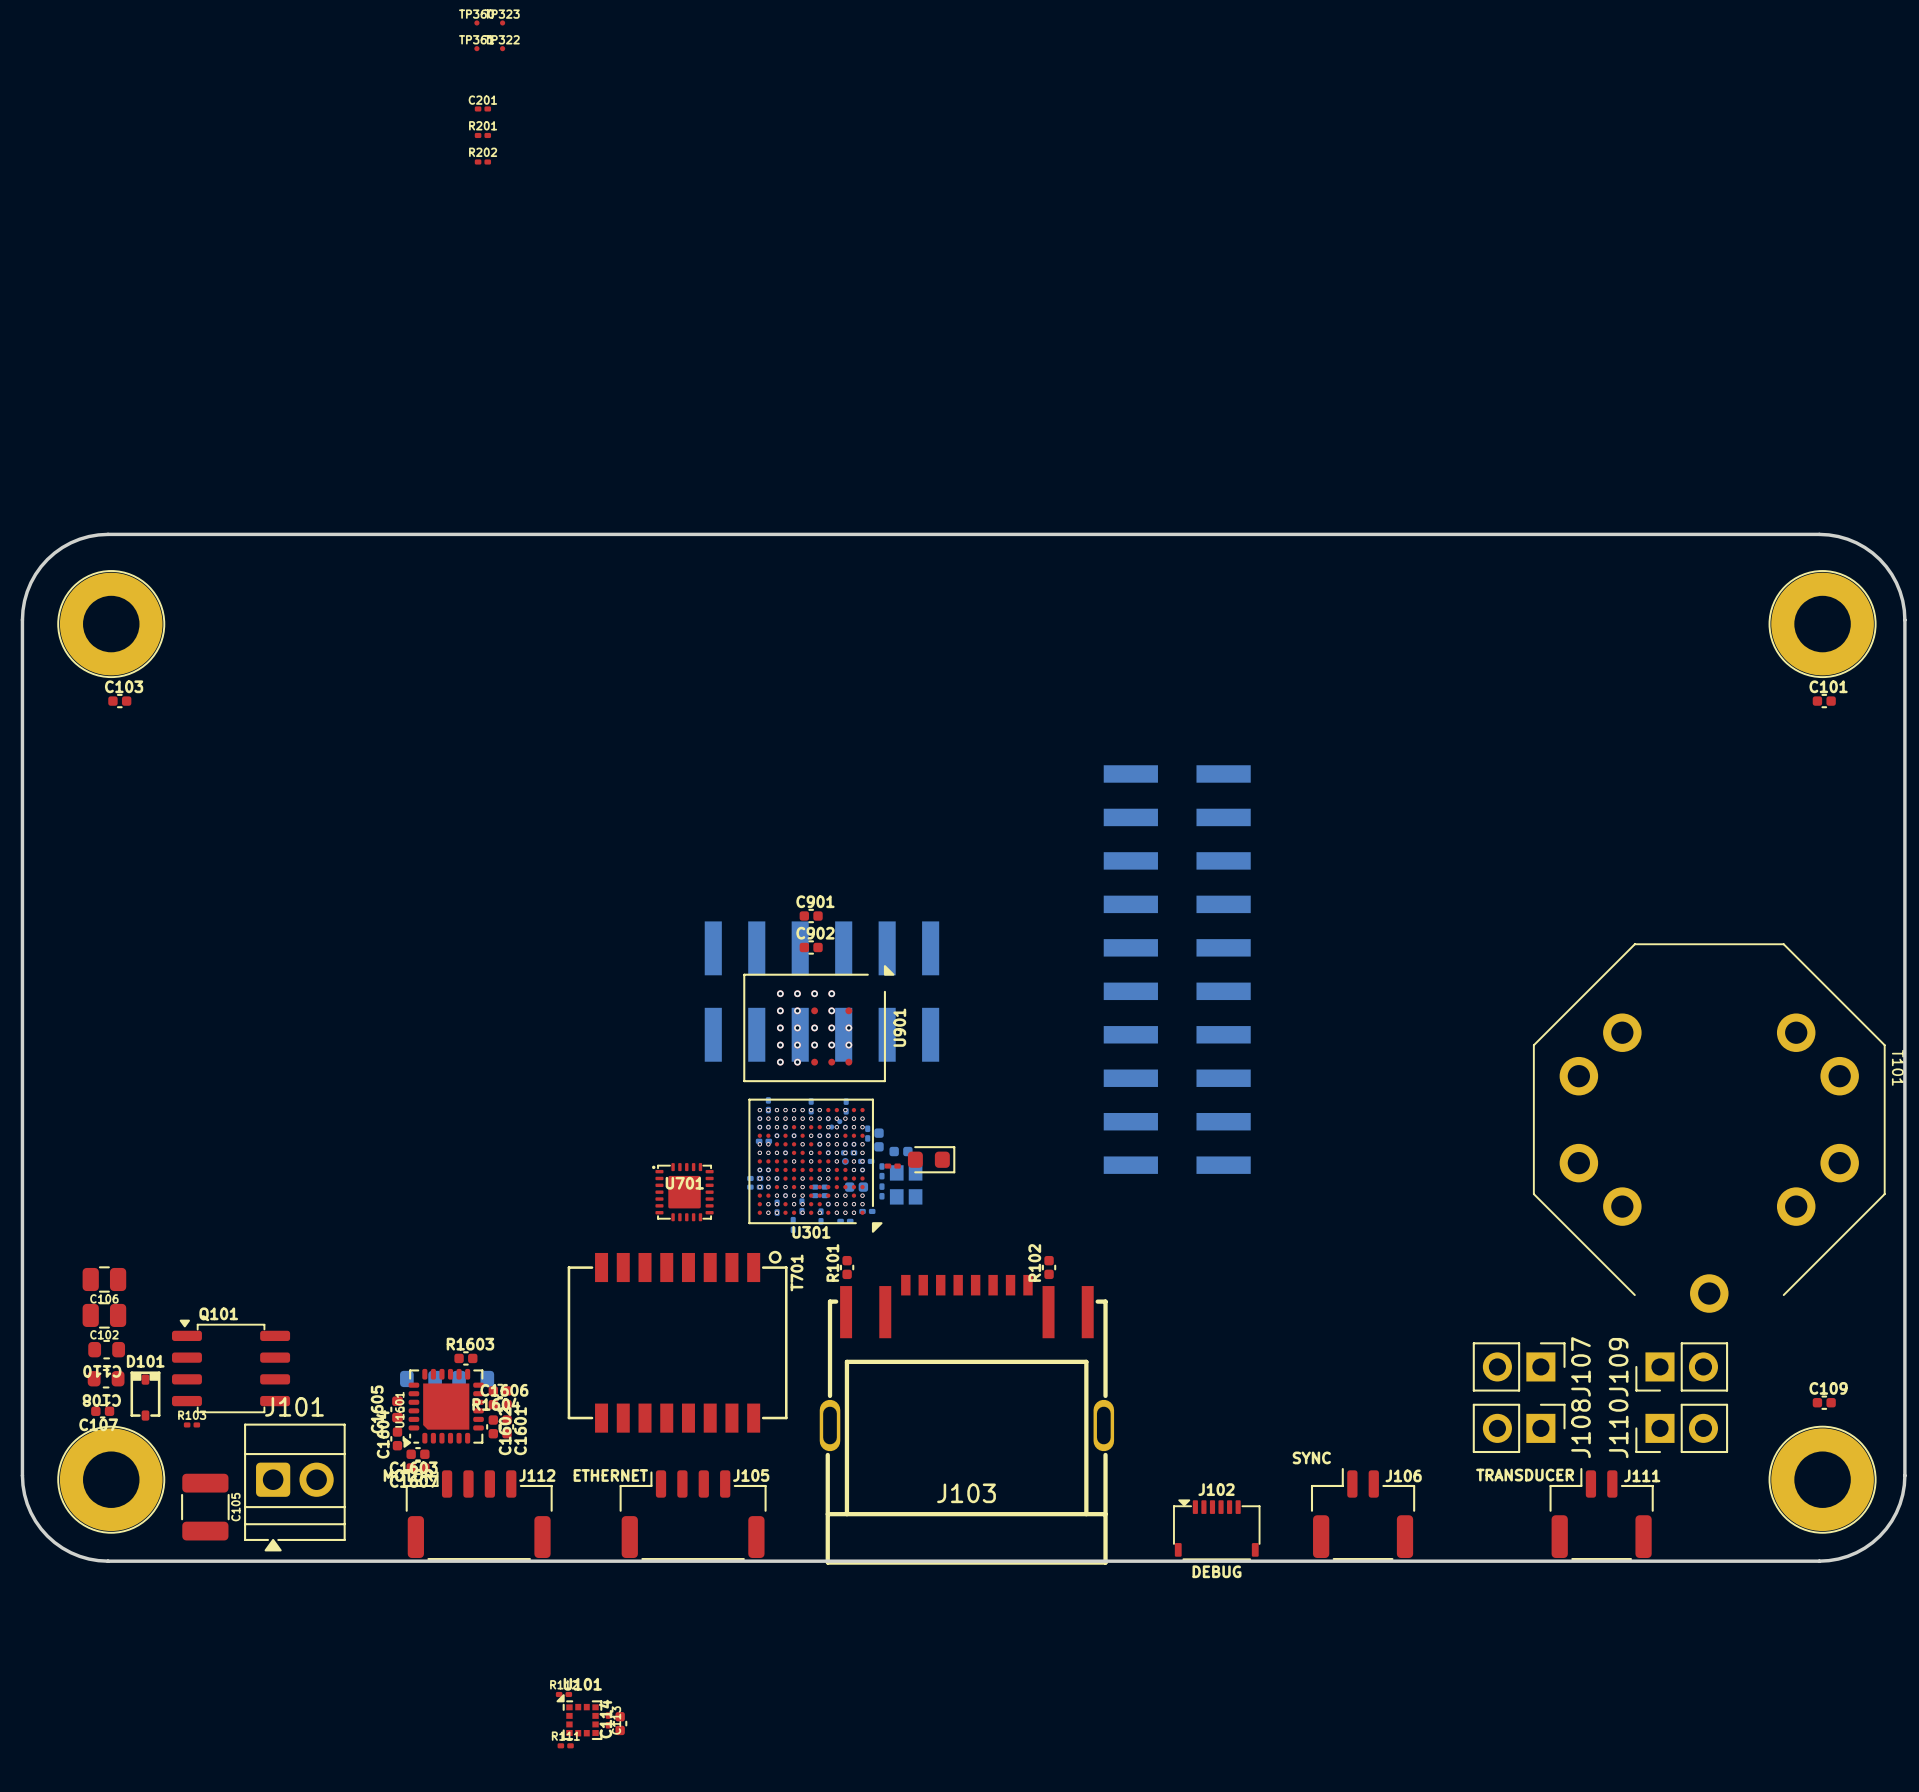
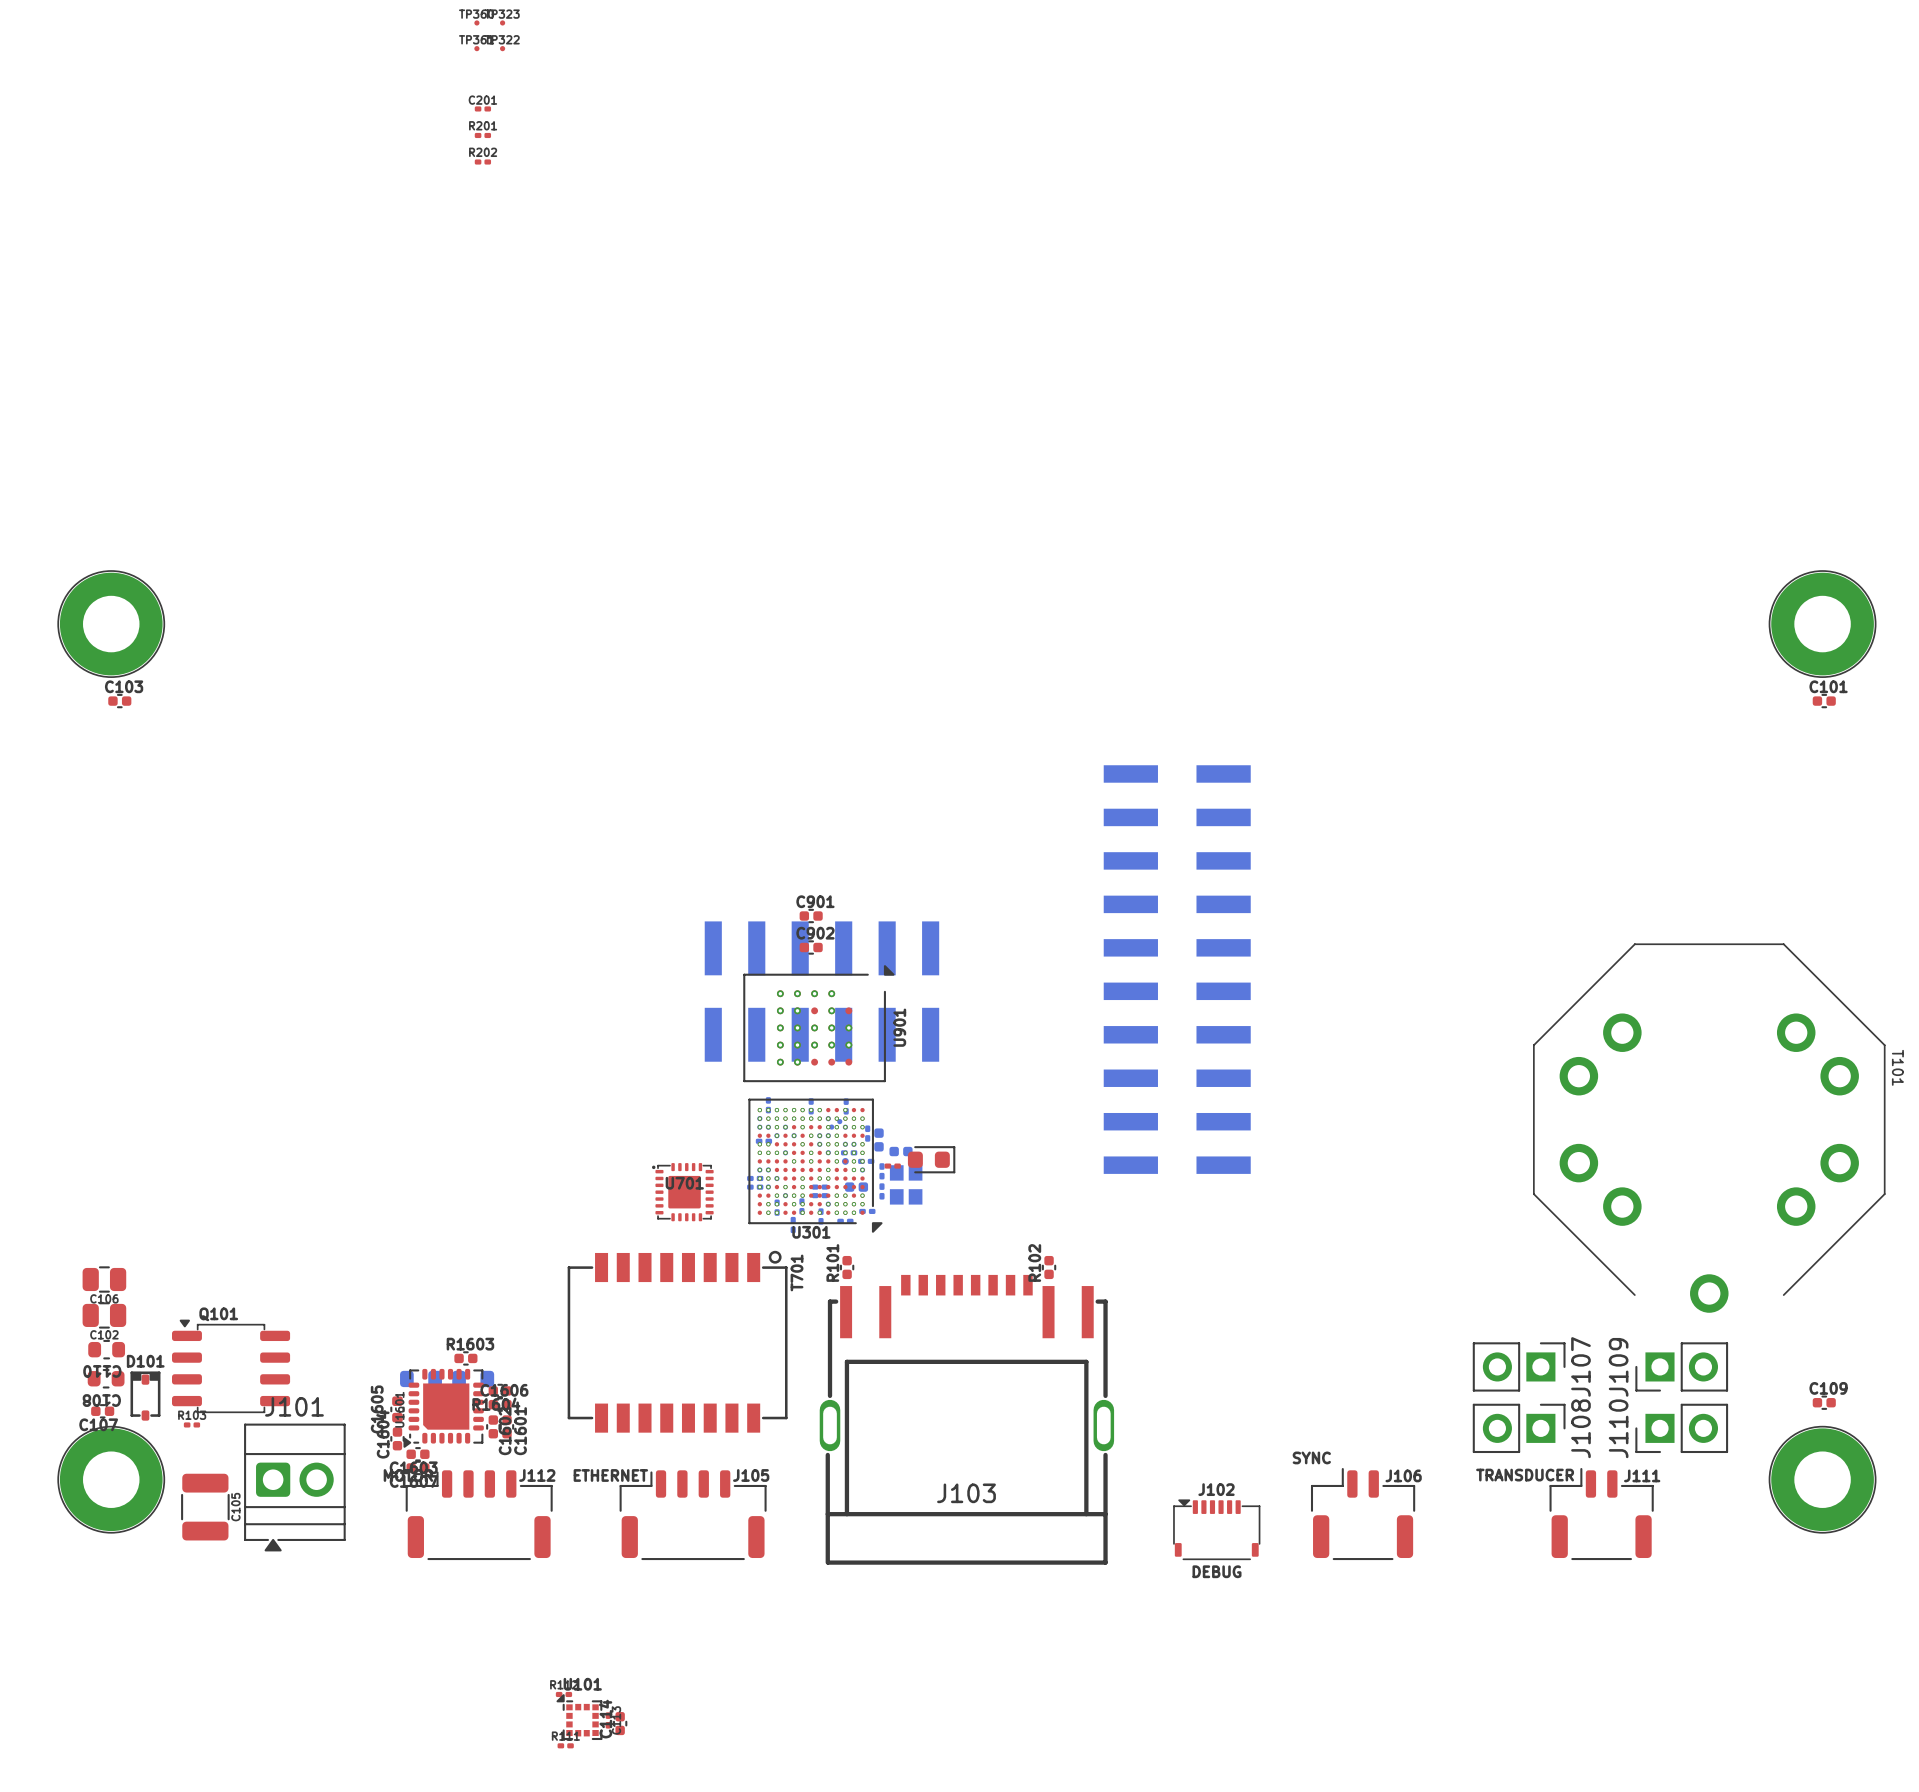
board edge: (1904, 619) (1902, 600) (1896, 582) (1879, 559) (1864, 547) (1847, 539) (1819, 534) (108, 534) (88, 536) (70, 542) (47, 559) (35, 574) (27, 591) (22, 619) (22, 1475) (24, 1494) (30, 1512) (41, 1528) (62, 1548) (88, 1559) (108, 1561) (1819, 1561) (1838, 1559) (1856, 1552) (1879, 1536) (1891, 1521) (1900, 1503) (1904, 1475) (1904, 620) -> none

